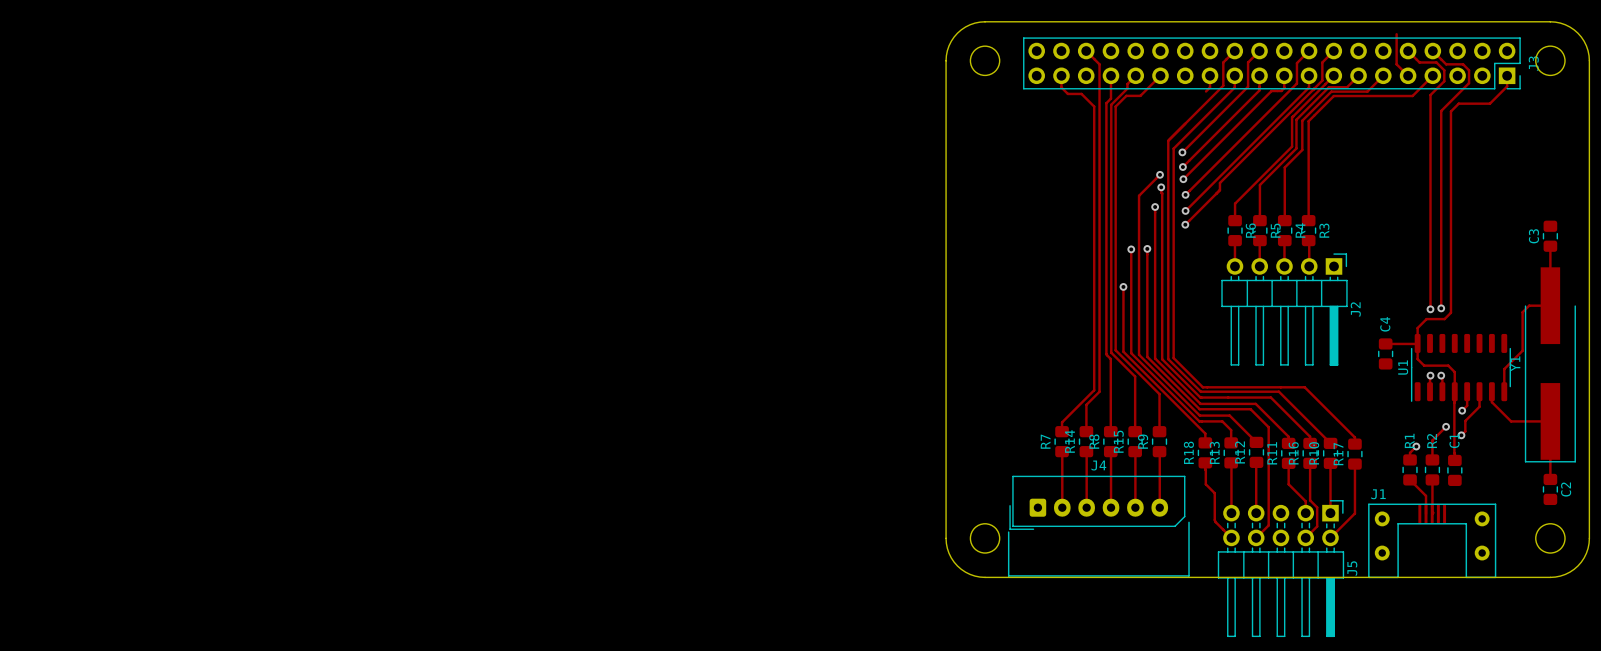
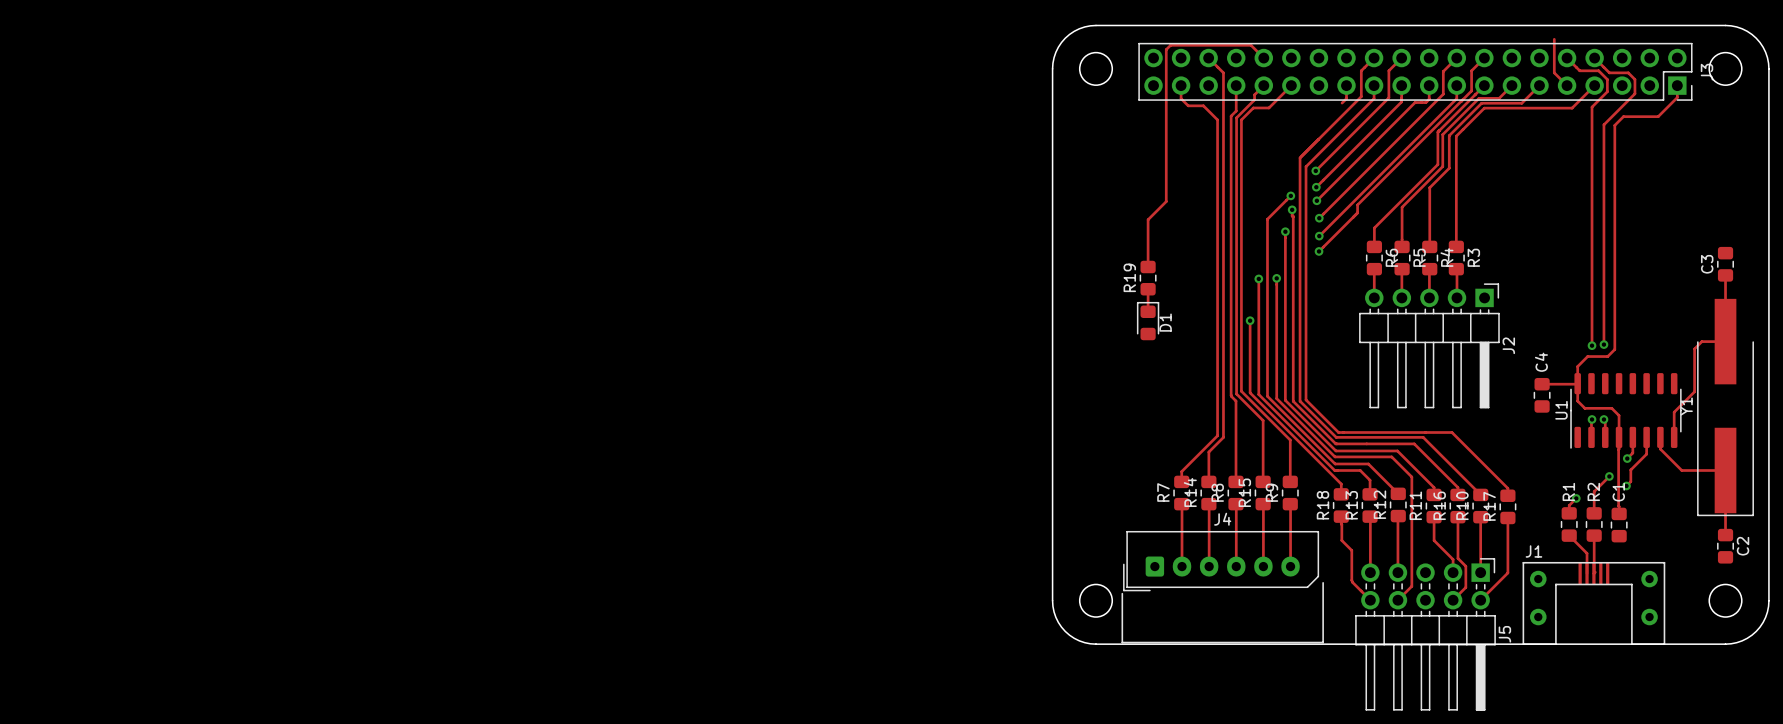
track: none -> (1263, 58) (1251, 45) (1170, 45) (1166, 49) (1166, 201) (1148, 219) (1148, 266)
R19: none -> (1148, 278)
track: none -> (1148, 289) (1148, 311)
D1: none -> (1148, 321)

